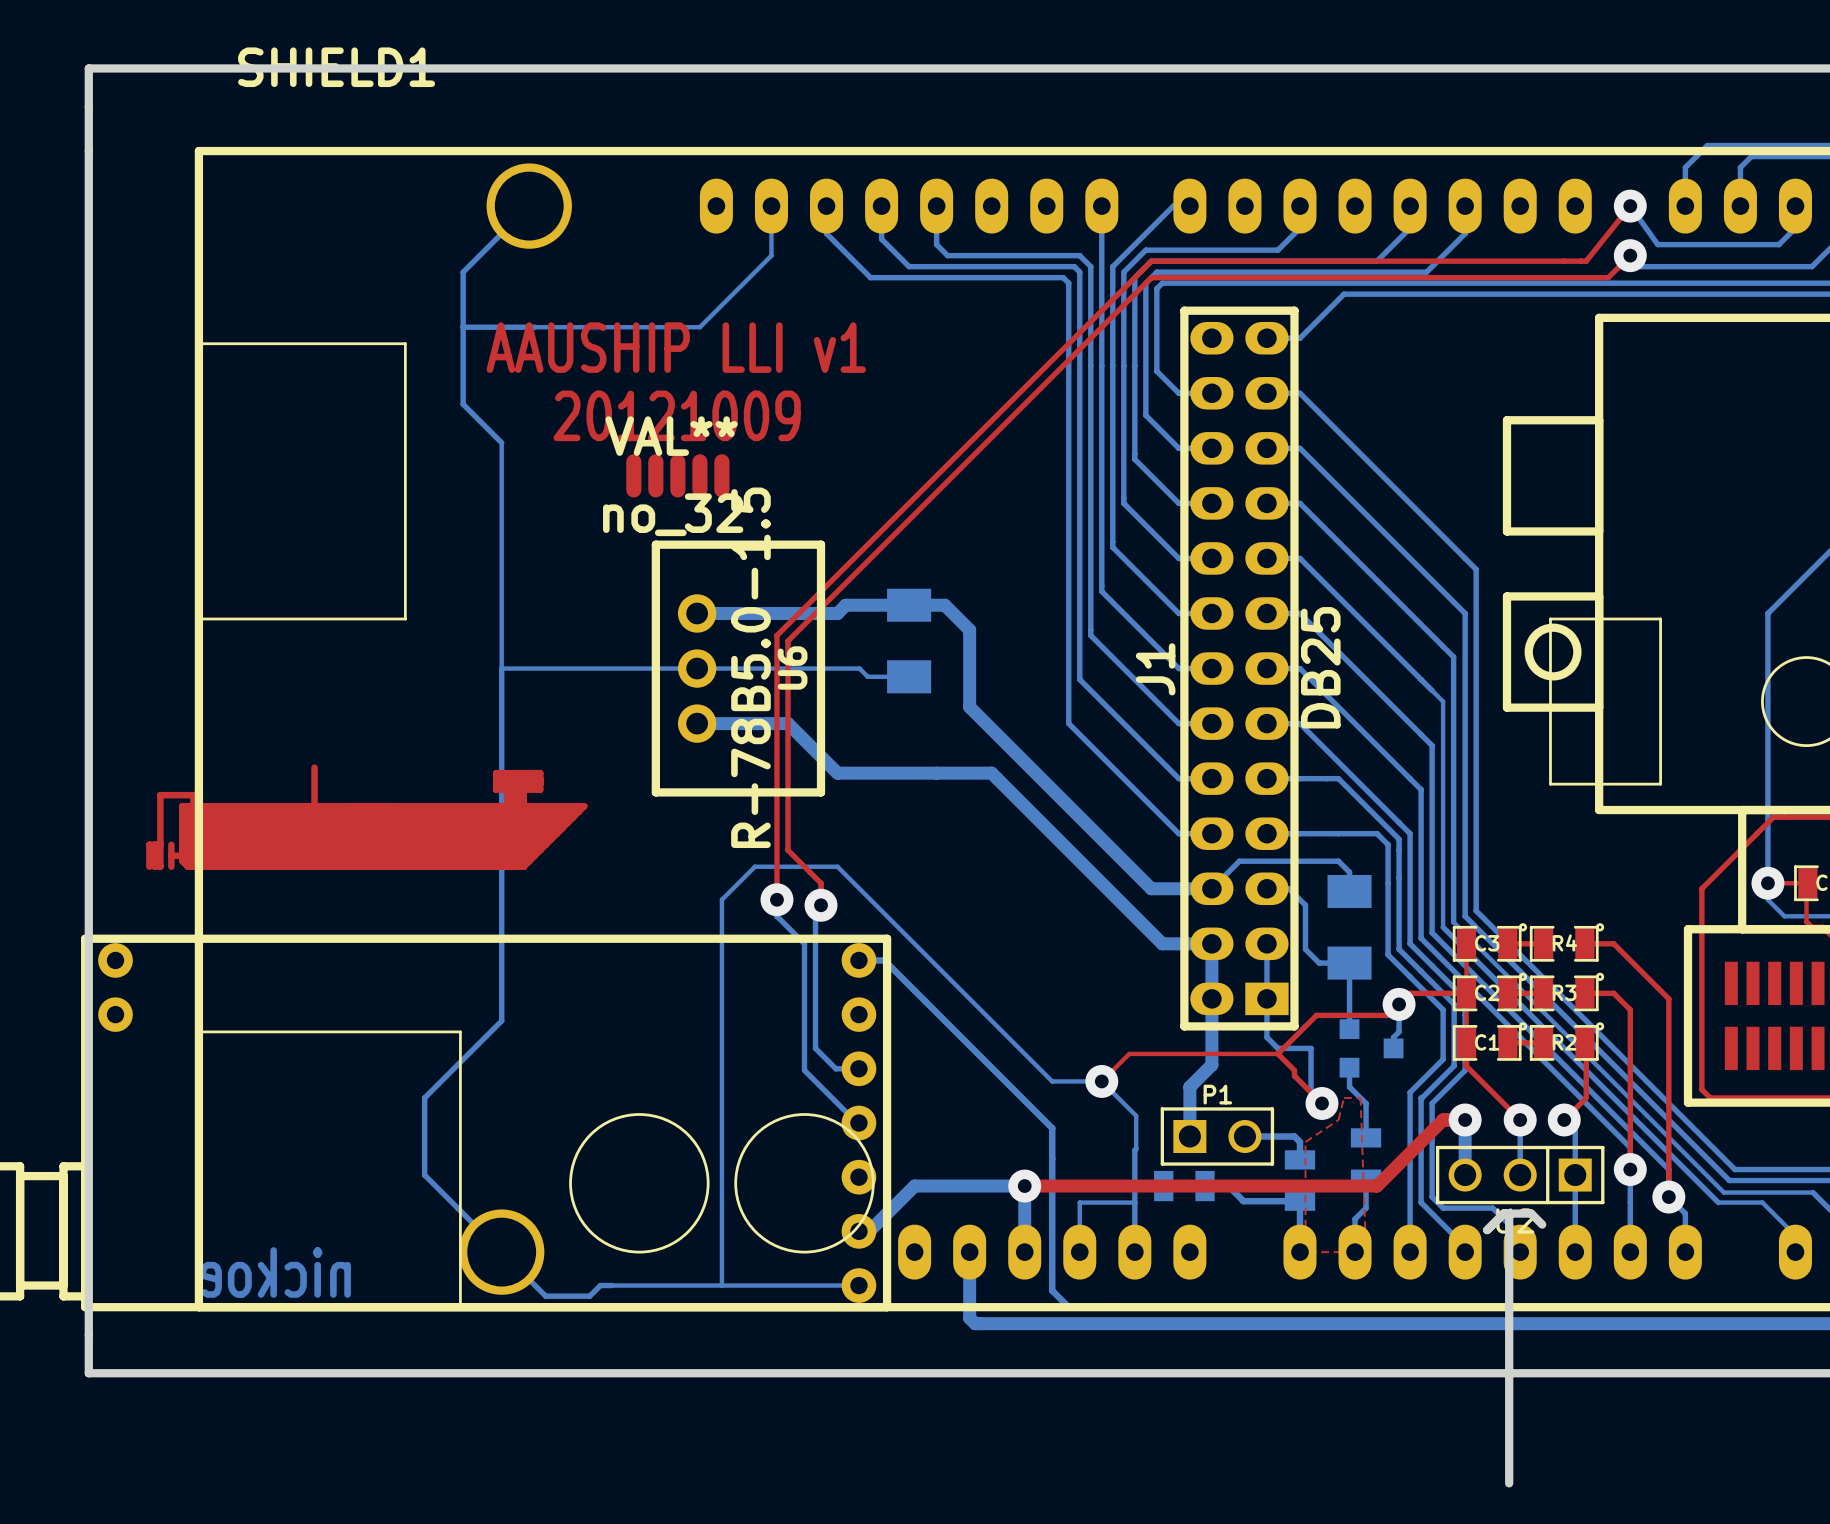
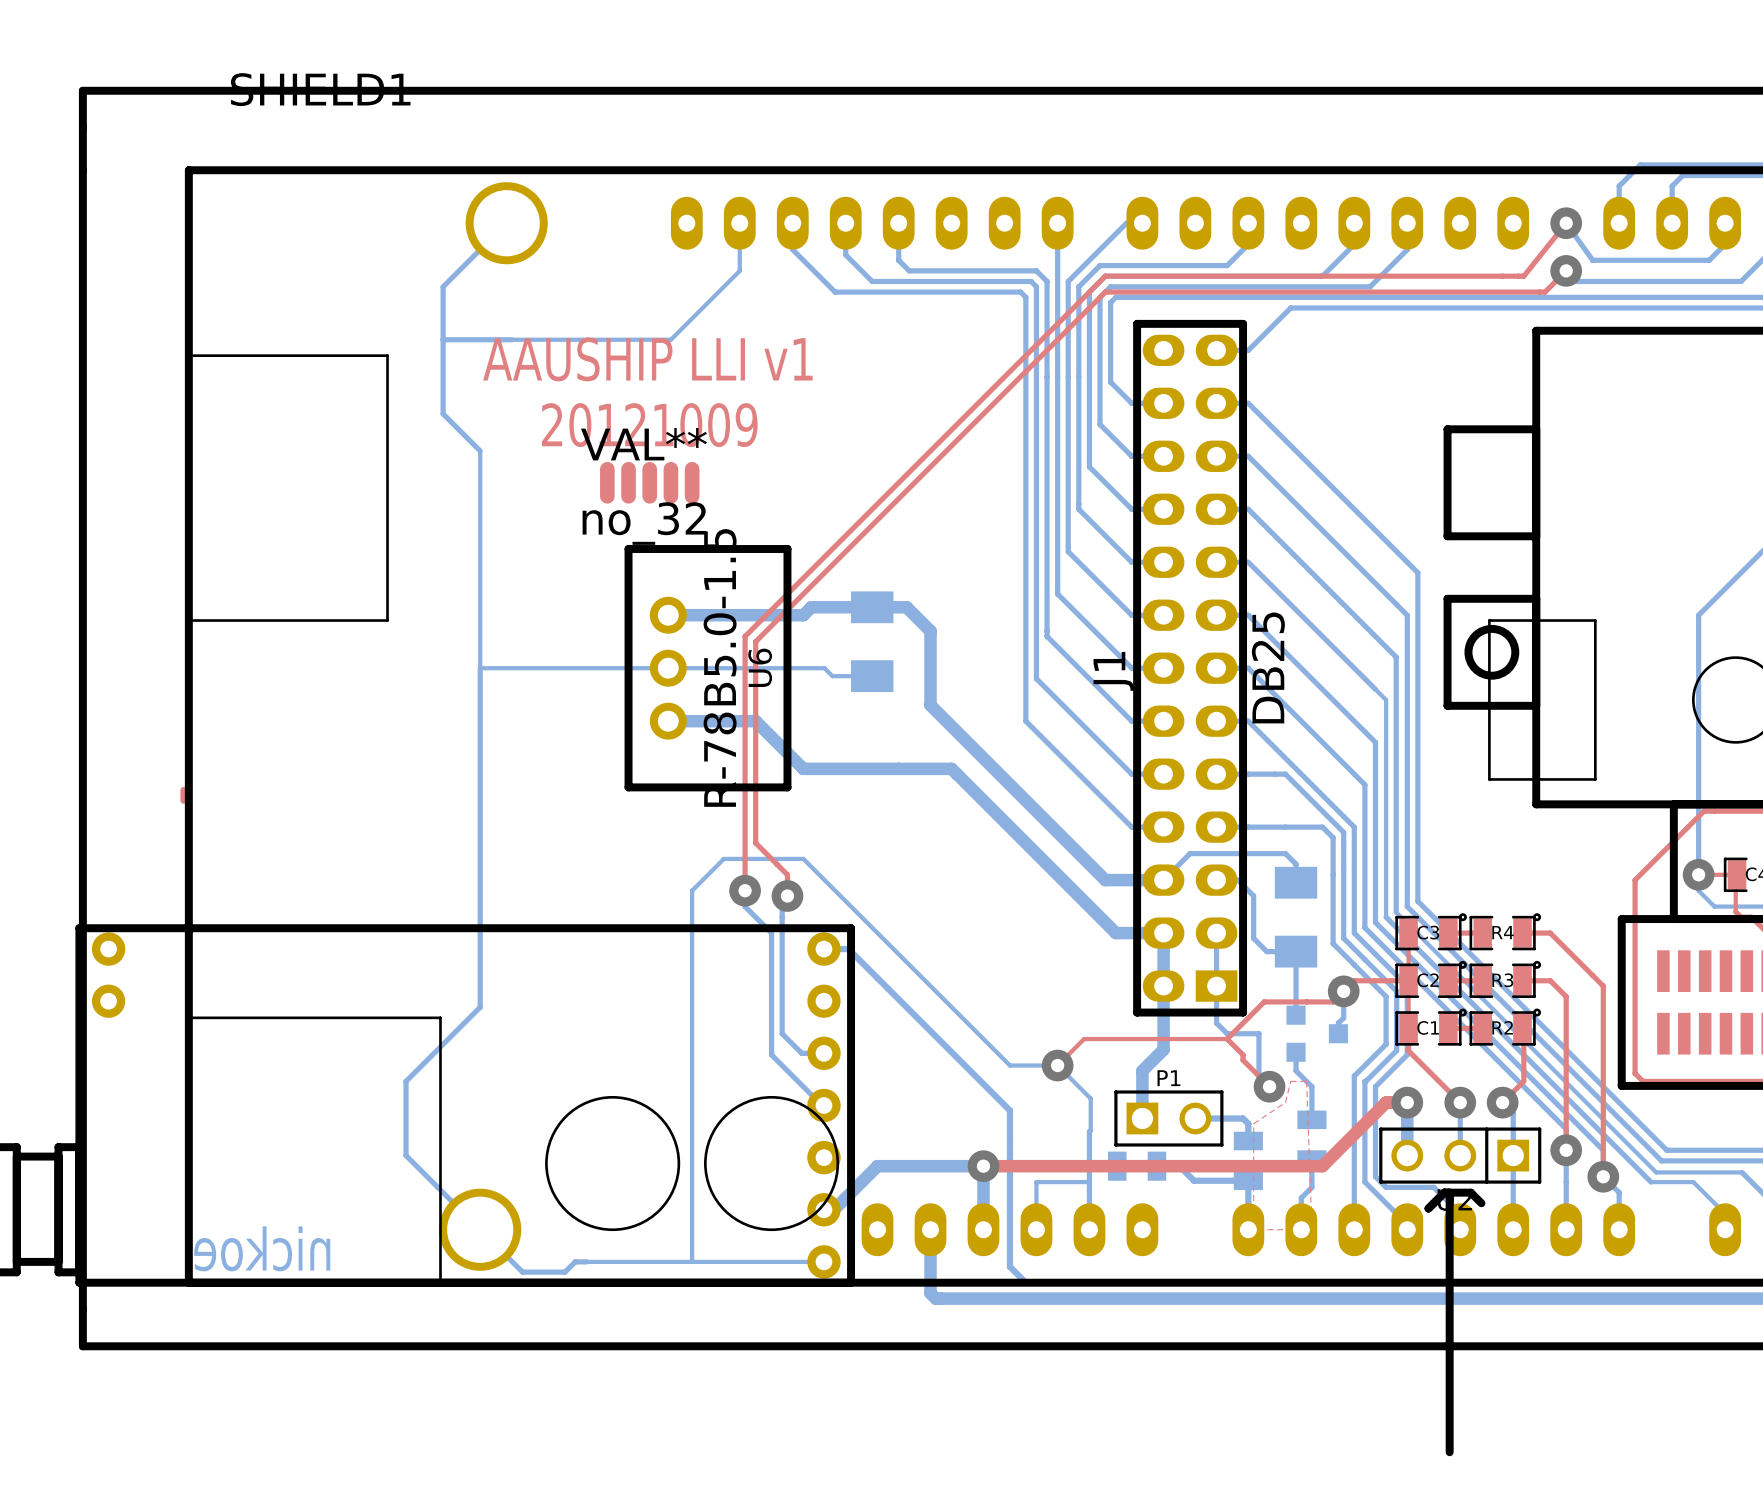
top track: (314, 767) (314, 806) -> none
top track: (496, 773) (496, 789) (540, 789) (540, 773) (496, 773) -> none
top track: (501, 778) (540, 778) -> none
top track: (540, 784) (501, 784) (501, 789) -> none
top track: (507, 789) (507, 806) (182, 806) (182, 861) -> none
top track: (512, 789) (512, 811) -> none
top track: (518, 789) (518, 811) -> none
top track: (523, 789) (523, 806) (584, 806) (523, 866) (187, 866) (182, 861) -> none
top track: (198, 795) (160, 795) (160, 866) (154, 866) (154, 844) -> none
top track: (182, 811) (578, 811) -> none
top track: (182, 817) (573, 817) -> none
top track: (182, 822) (567, 822) -> none
top track: (182, 828) (562, 828) -> none
top track: (182, 833) (556, 833) -> none
top track: (182, 839) (551, 839) -> none
top track: (160, 844) (149, 844) (149, 866) -> none
top track: (171, 844) (171, 866) -> none
top track: (182, 844) (545, 844) -> none
top track: (182, 850) (540, 850) -> none
top track: (171, 855) (534, 855) -> none
top track: (182, 861) (529, 861) -> none

